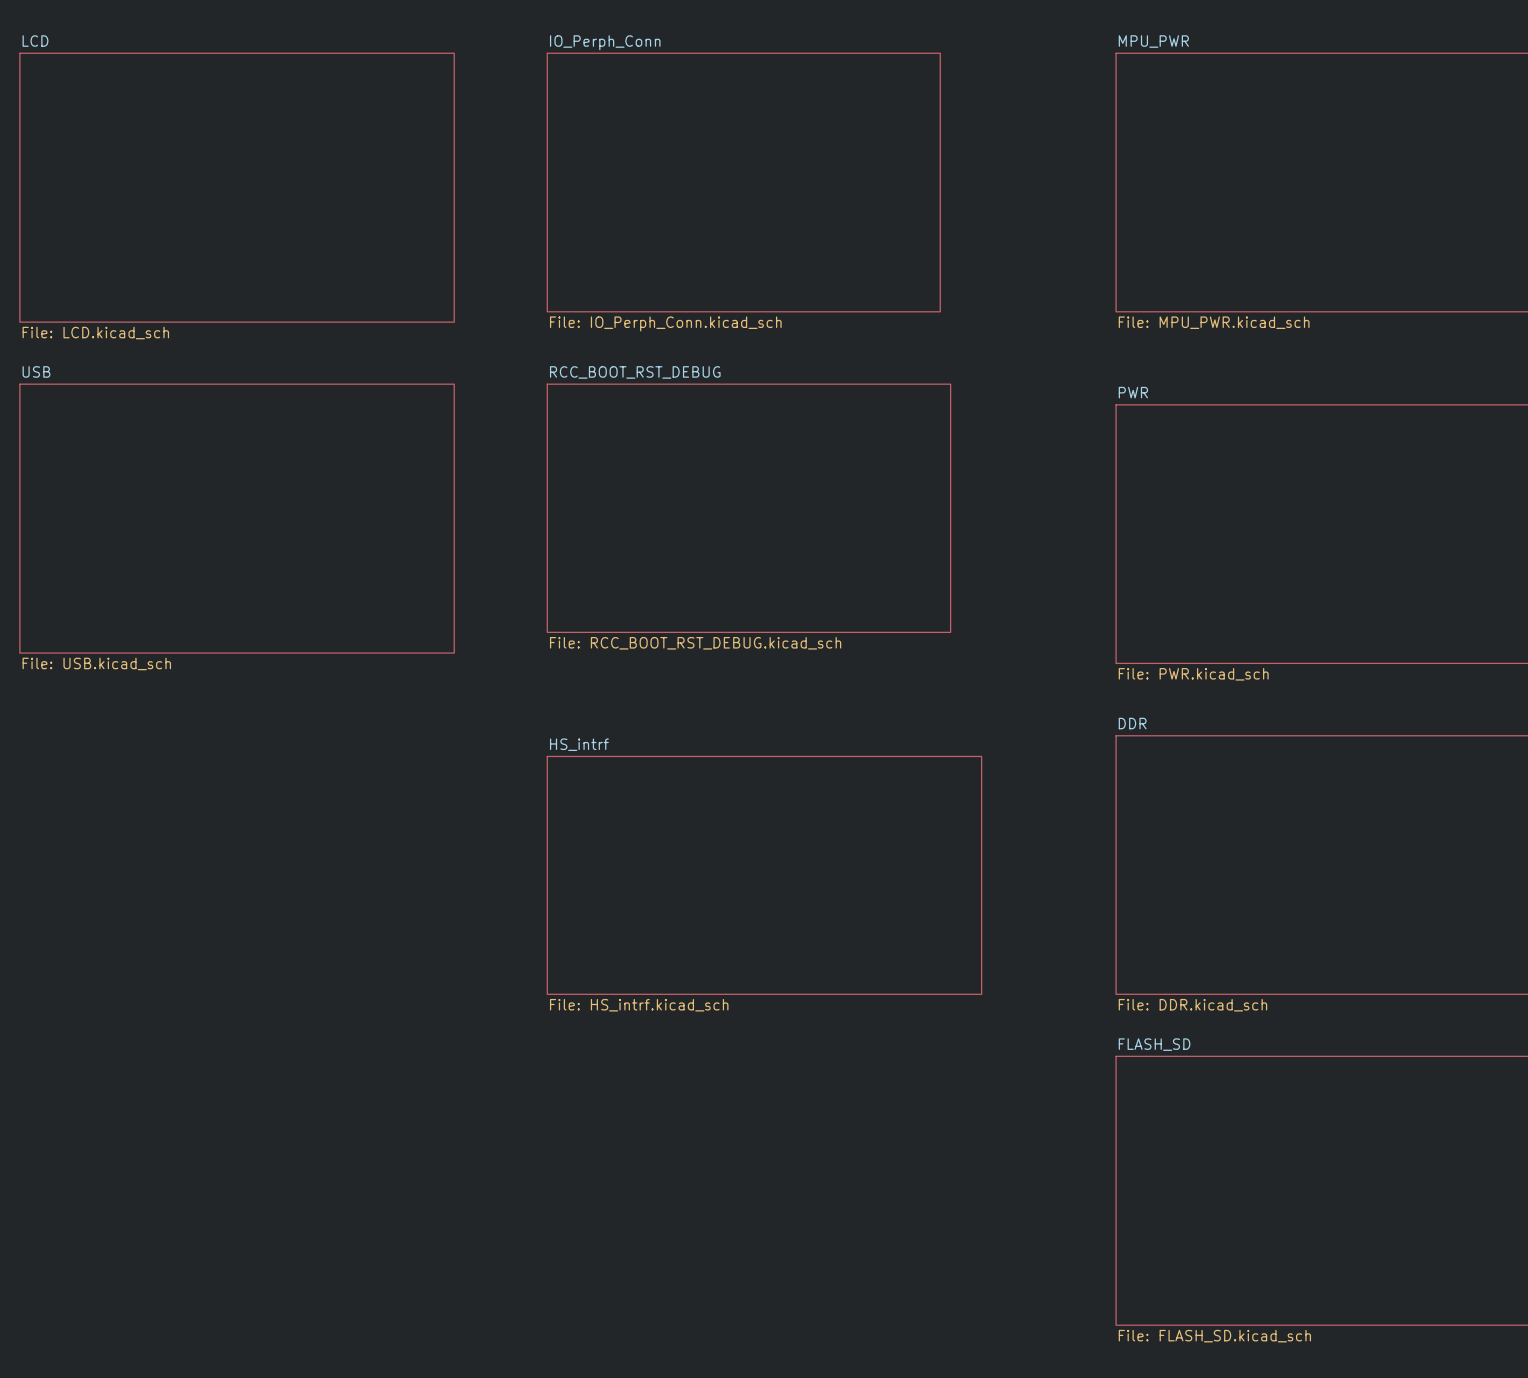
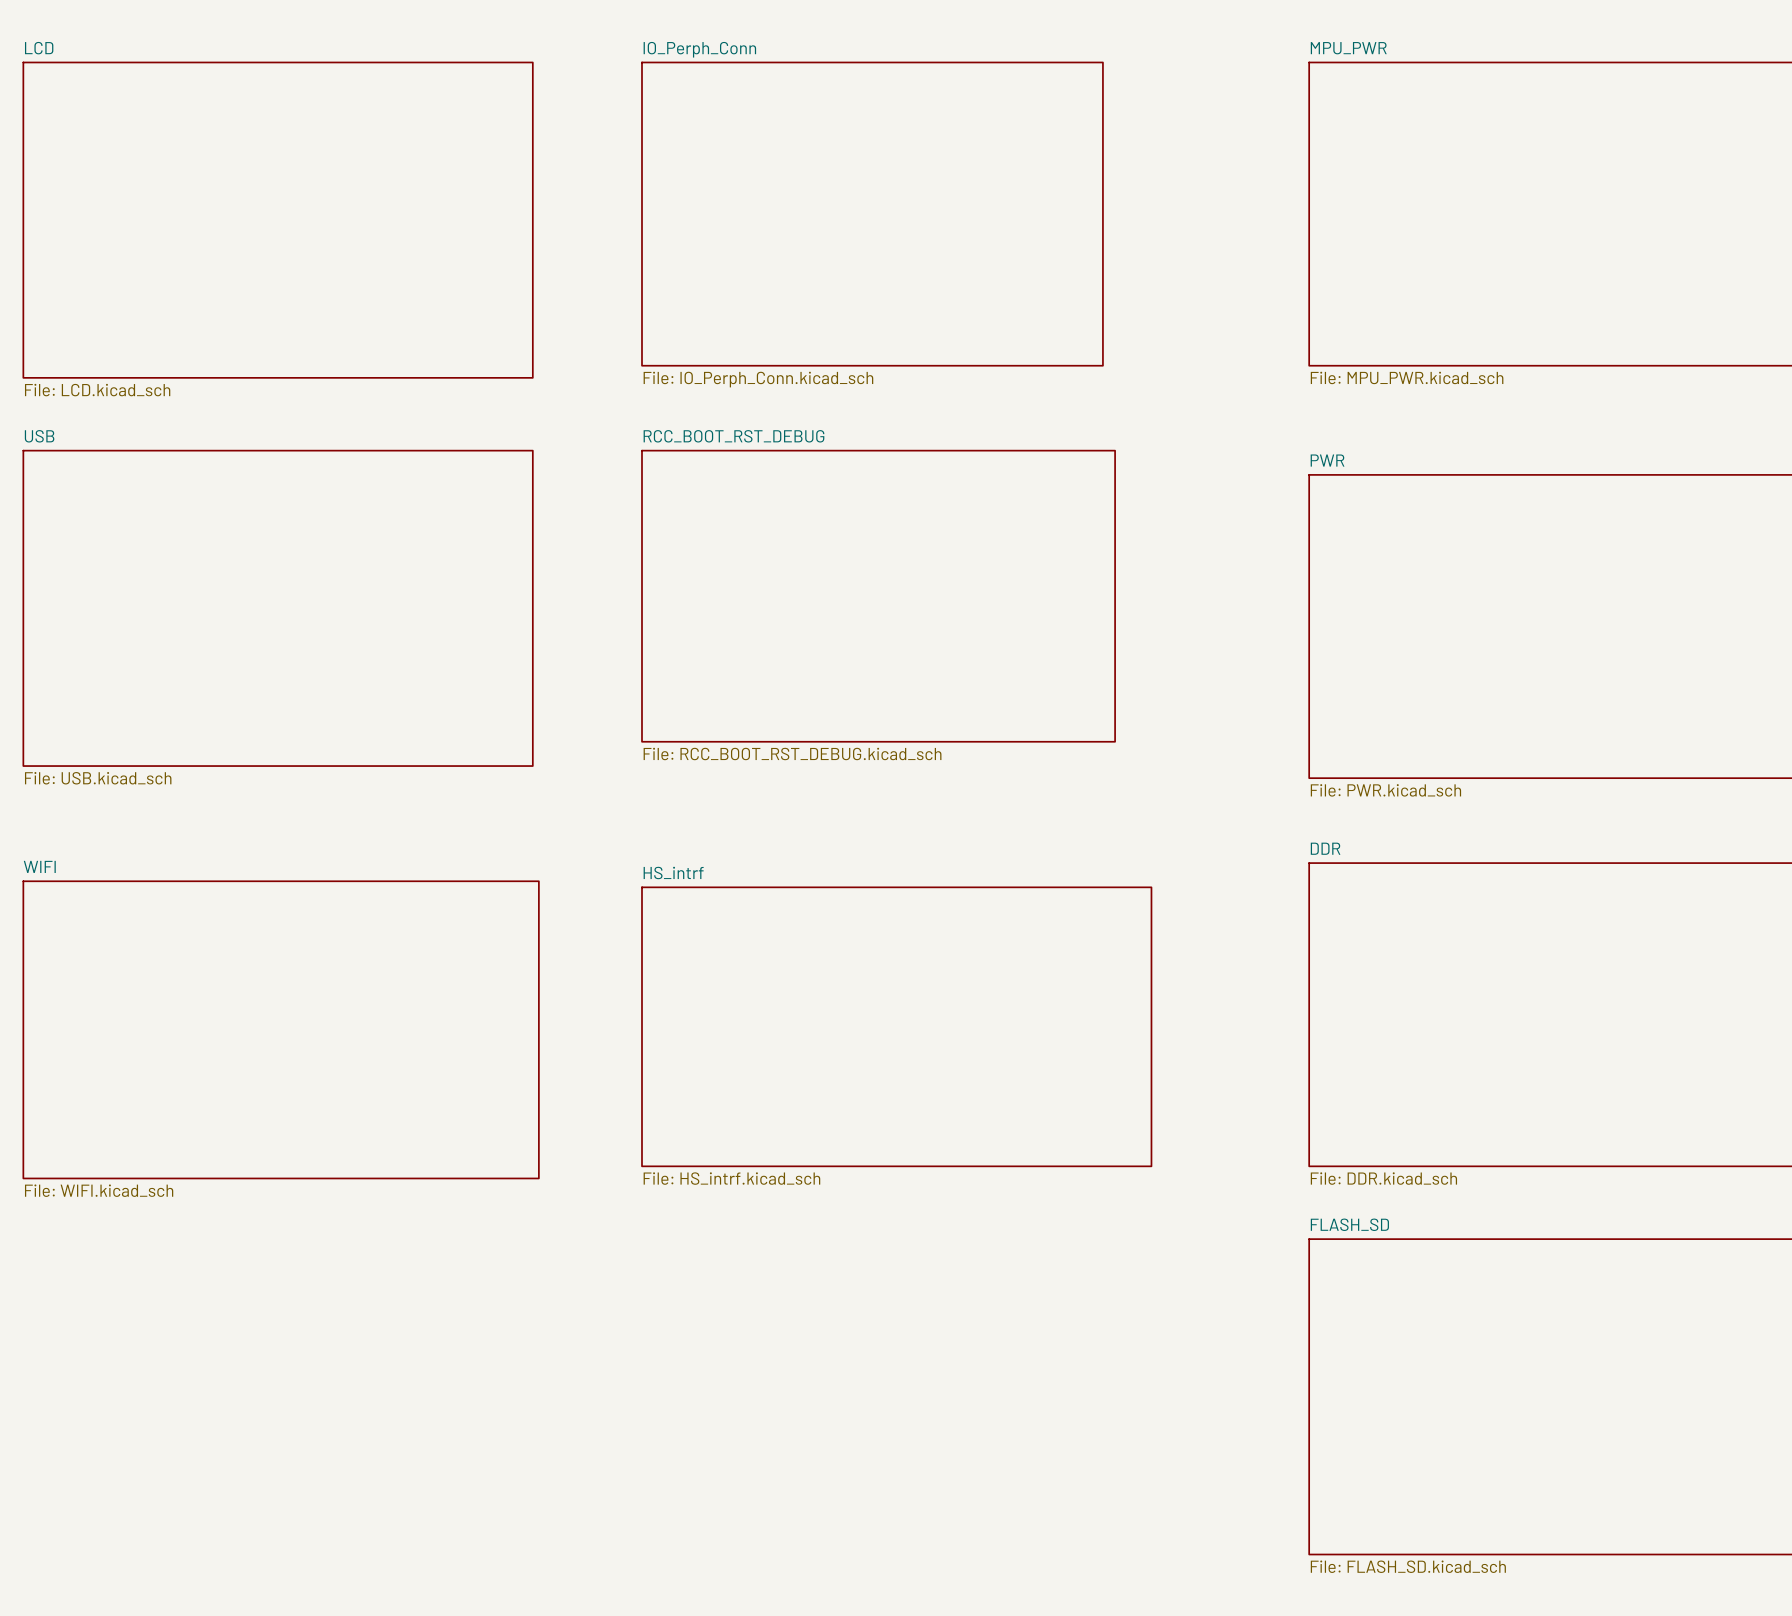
sheet WIFI: none -> File: WIFI.kicad_sch (281, 1029)

